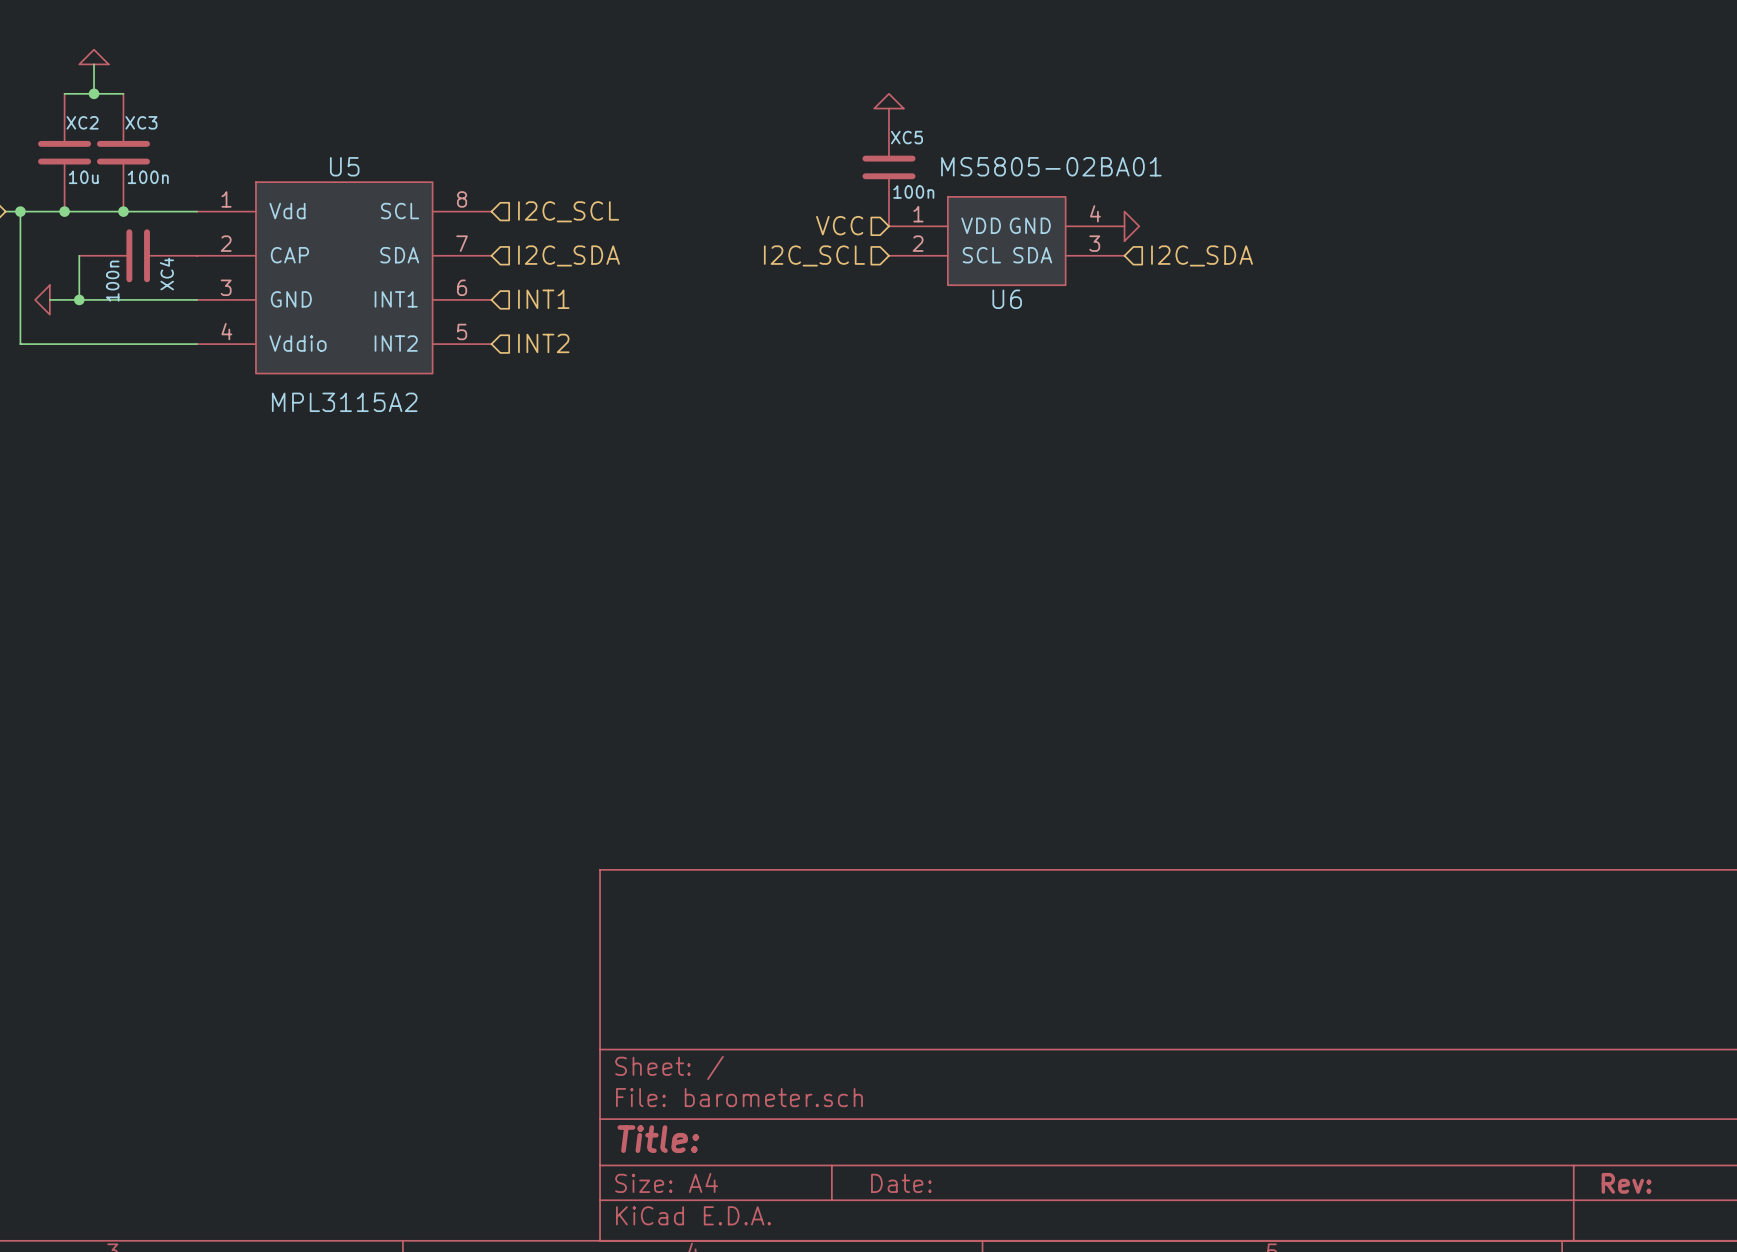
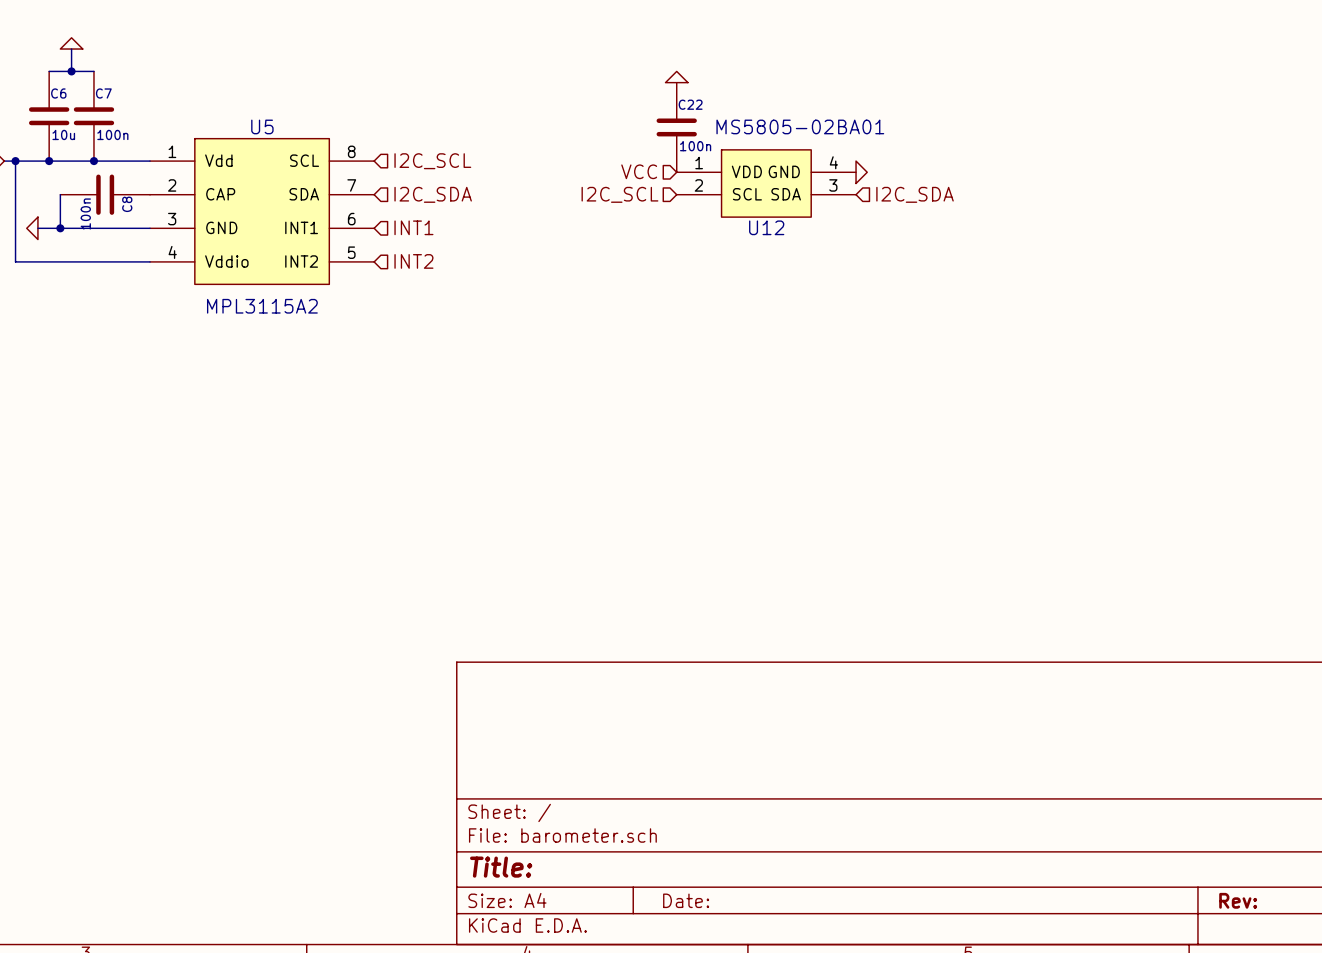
XC2 name: XC2 (82, 122) -> C6 (58, 93)
XC3 name: XC3 (141, 122) -> C7 (103, 93)
XC5 name: XC5 (906, 137) -> C22 (690, 104)
XC4 name: XC4 (166, 274) -> C8 (127, 204)
U6 name: U6 (1007, 299) -> U12 (766, 227)

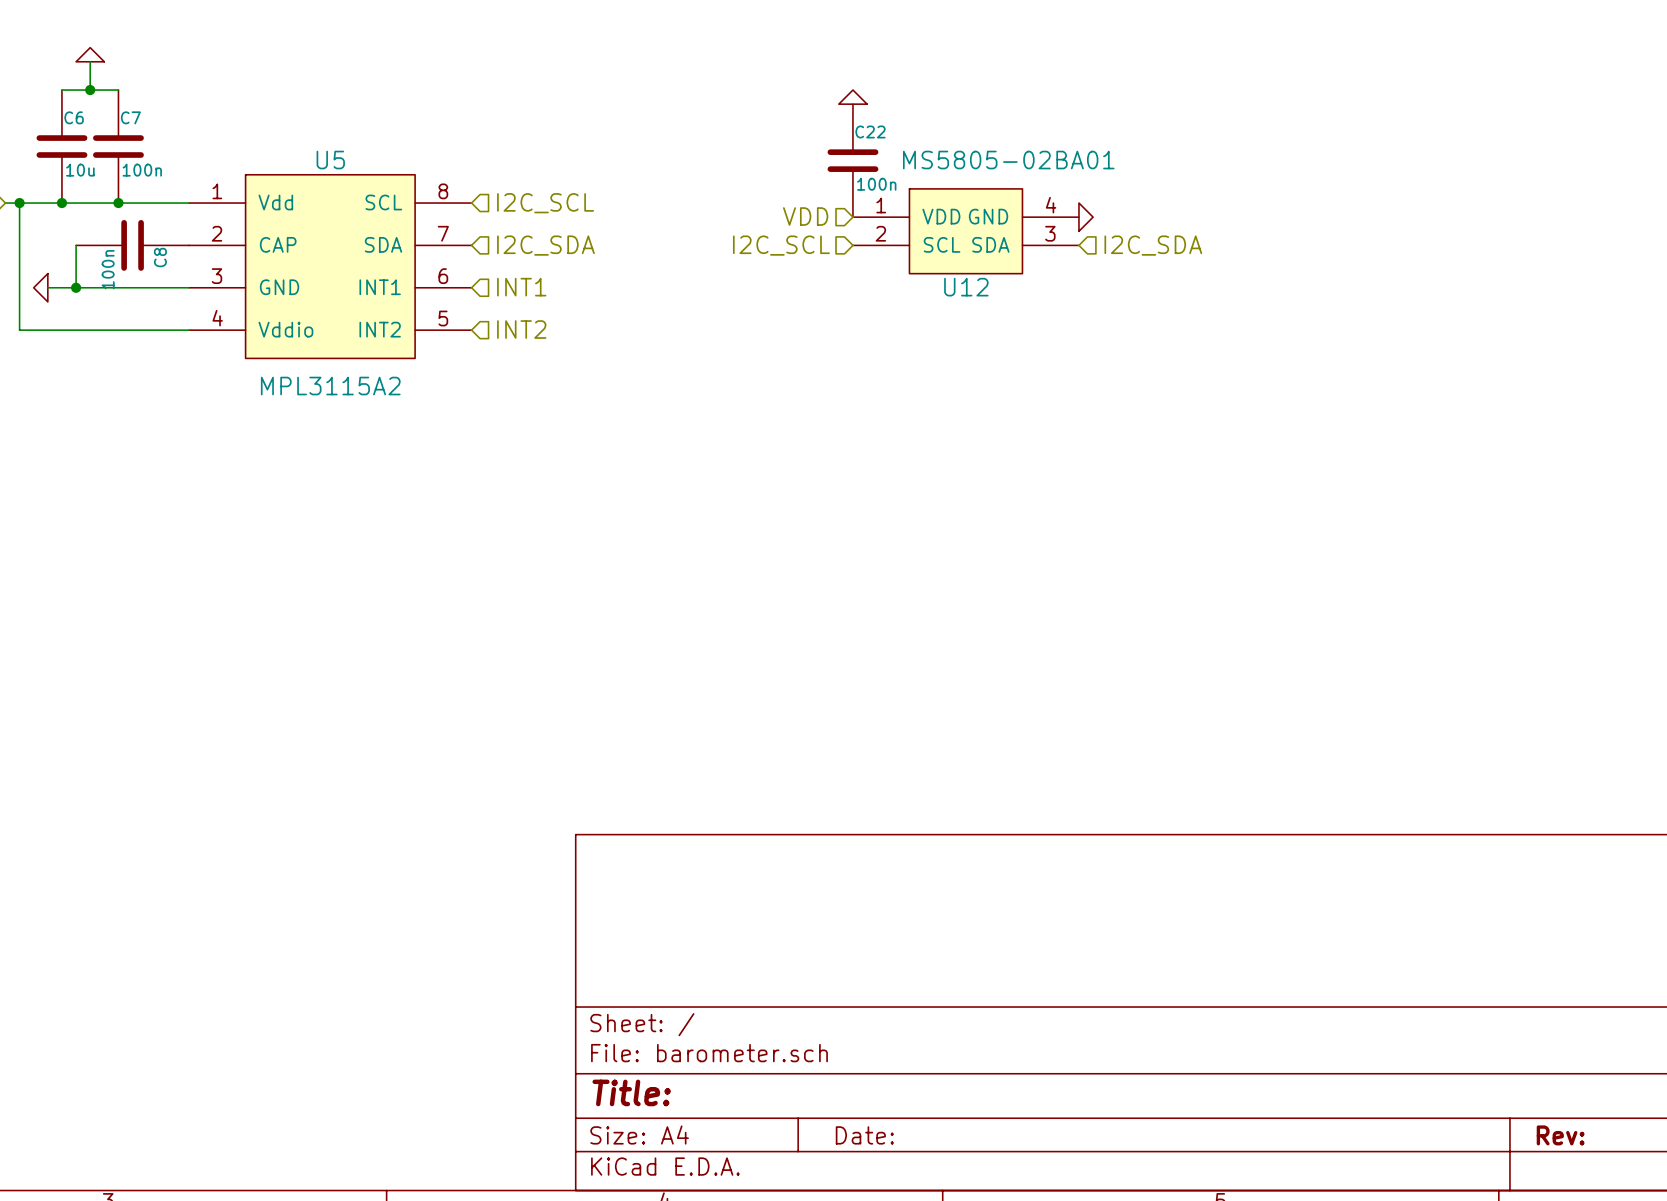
hierarchical label: VCC (639, 171) -> VDD (805, 216)

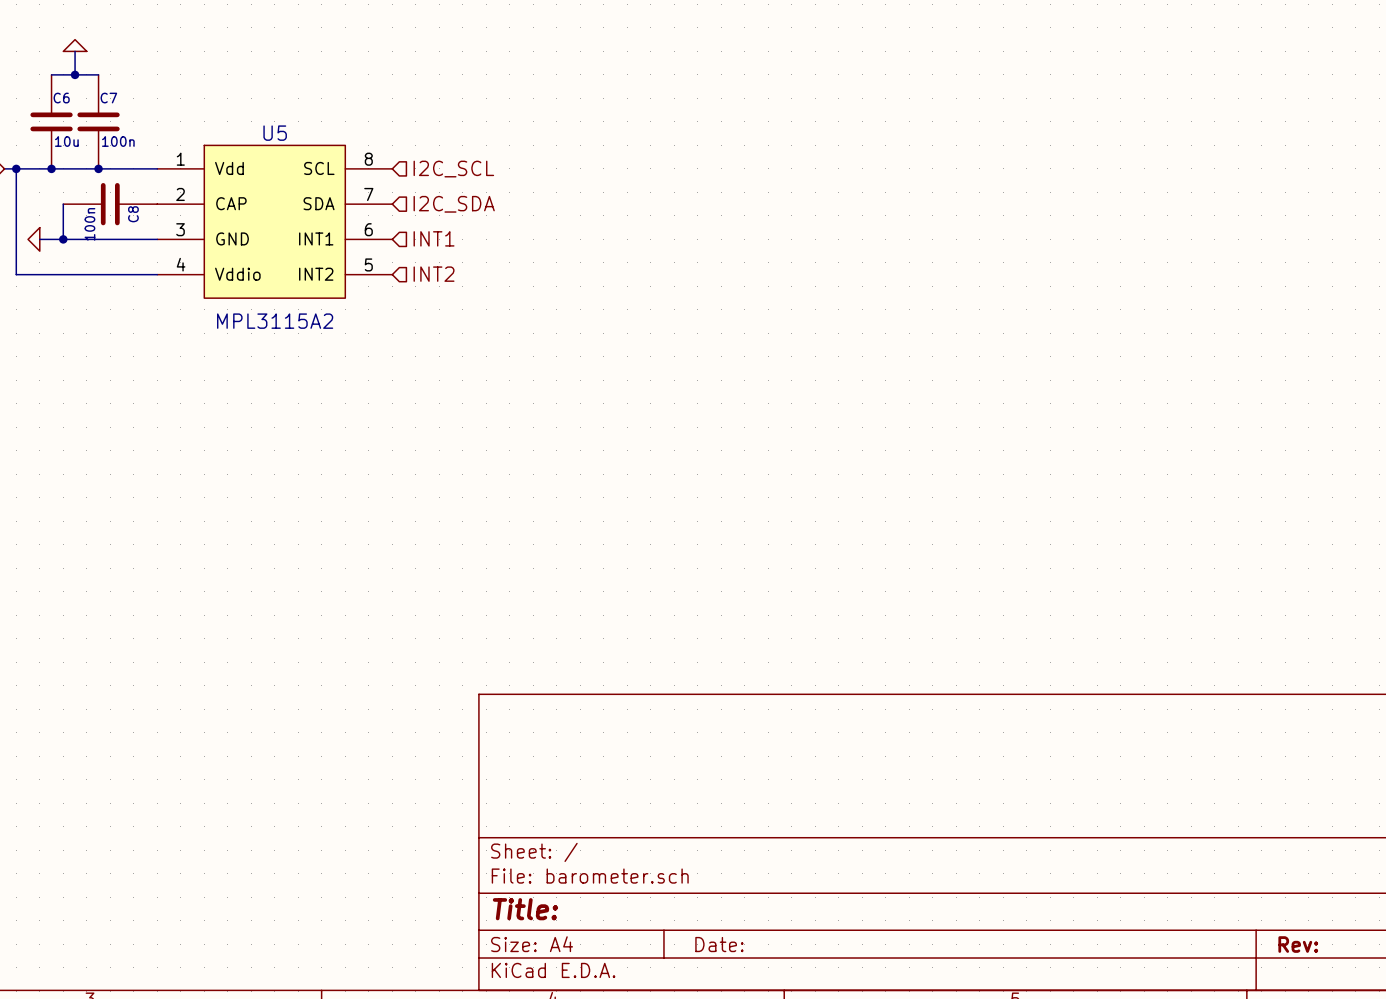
power symbol: (852, 97) -> none
C22: 100n (852, 160) -> none
hierarchical label: VDD (805, 216) -> none
power symbol: (1086, 217) -> none
U12: MS5805-02BA01 (965, 231) -> none
hierarchical label: I2C_SCL (781, 245) -> none
hierarchical label: I2C_SDA (1153, 245) -> none

